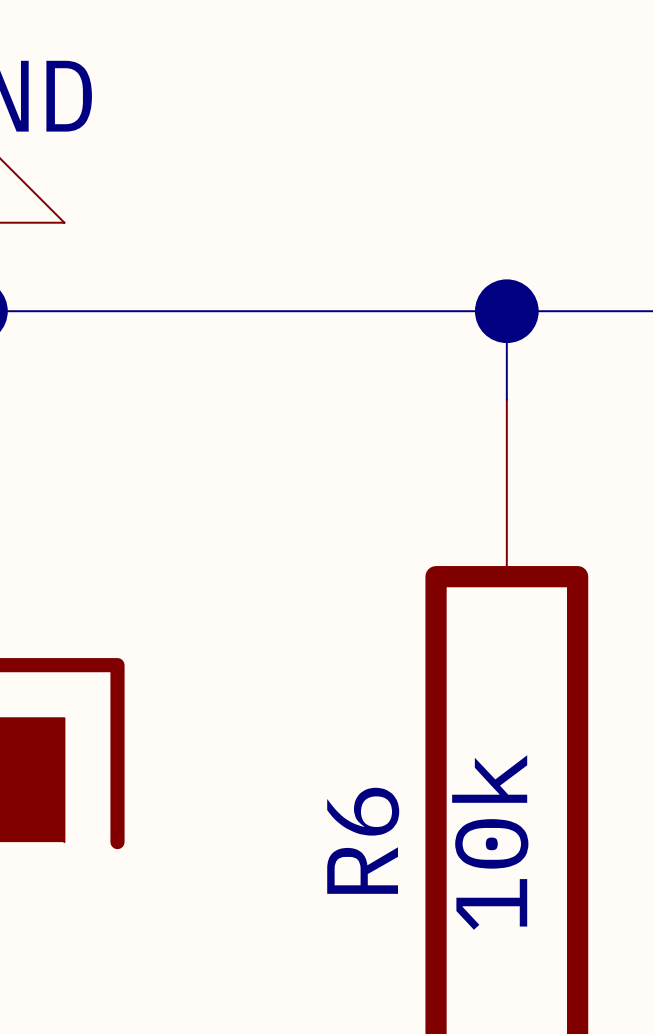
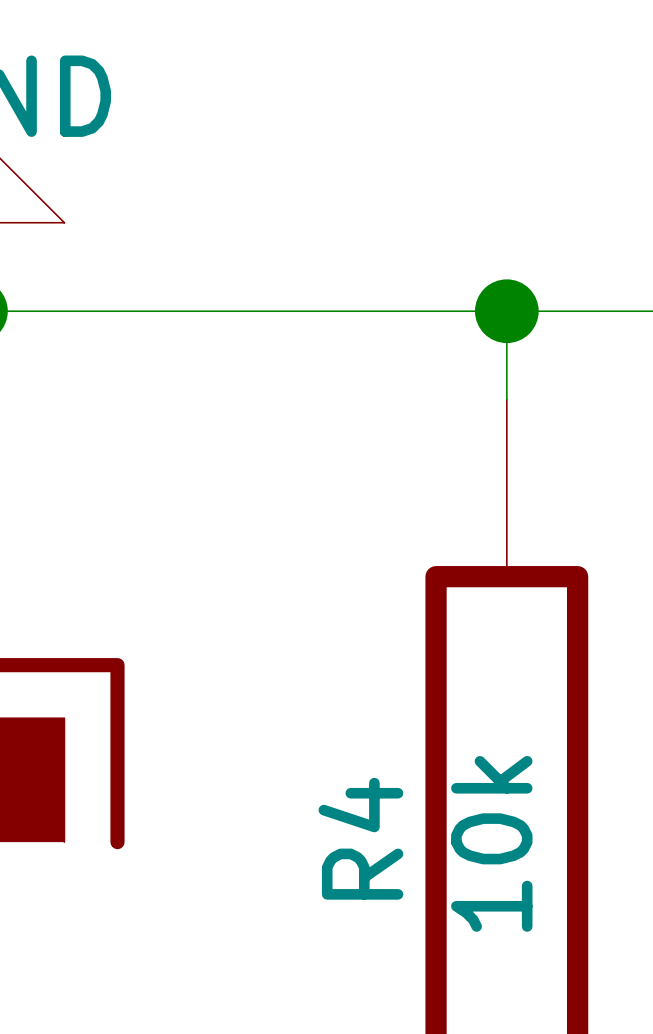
R6 name: R6 (363, 840) -> R4 (360, 838)

